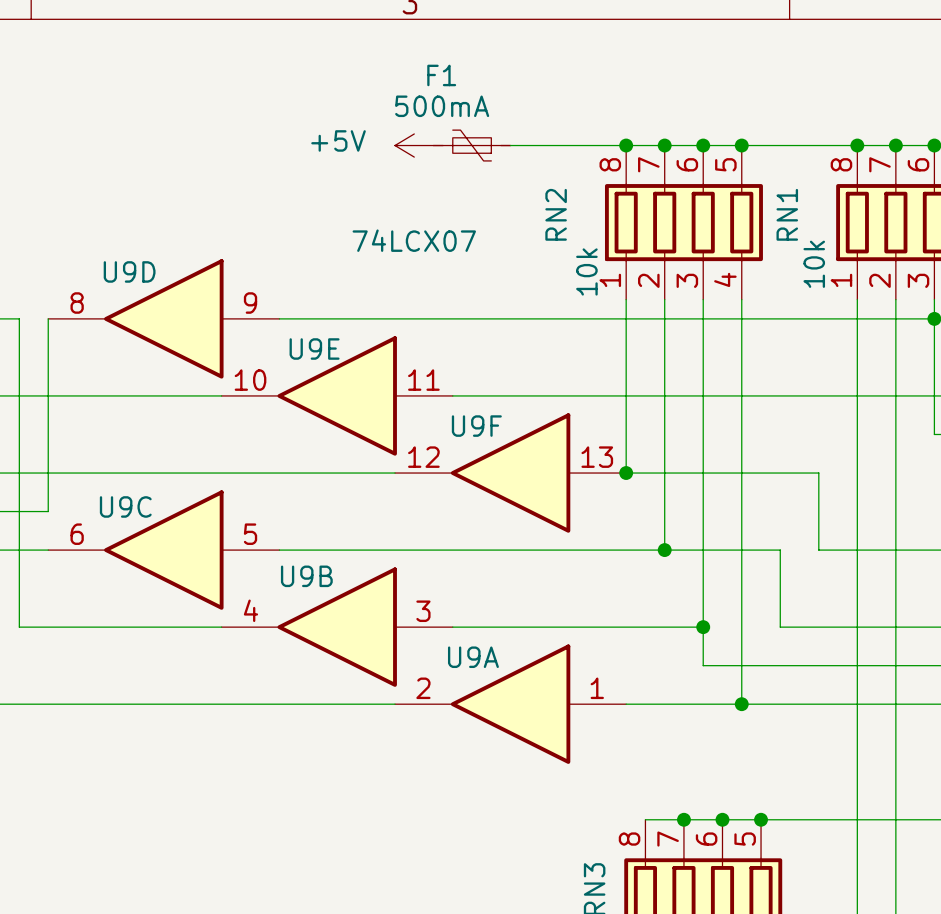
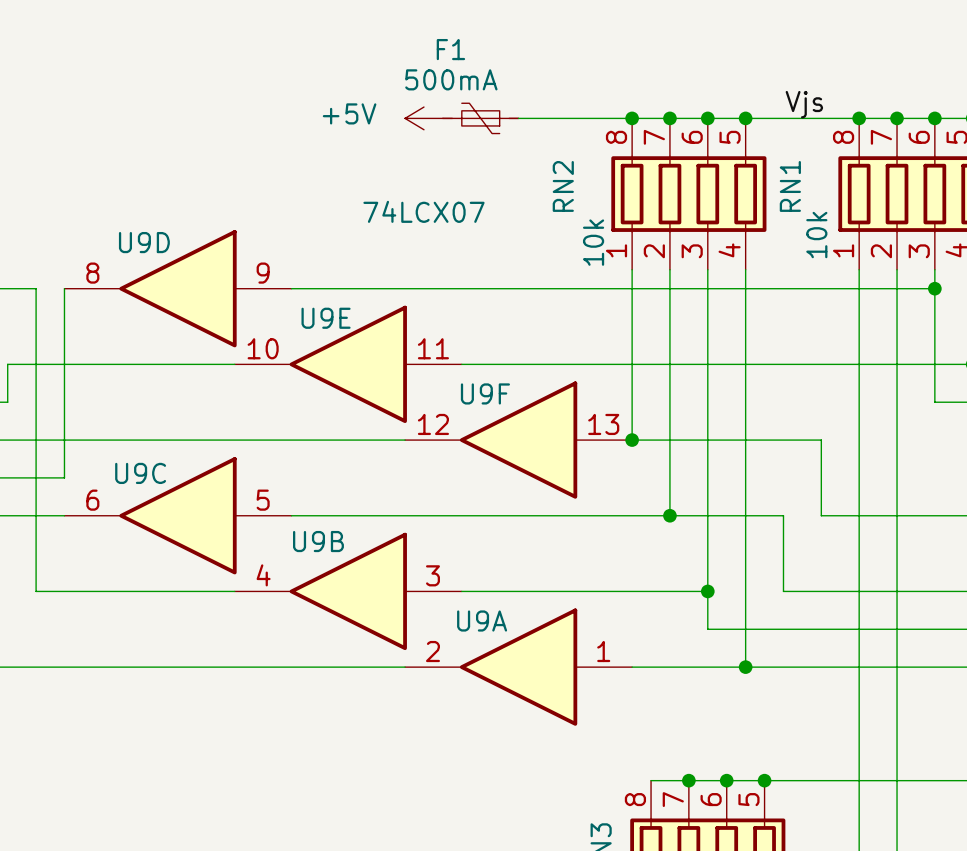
label: none -> Vjs (804, 104)

